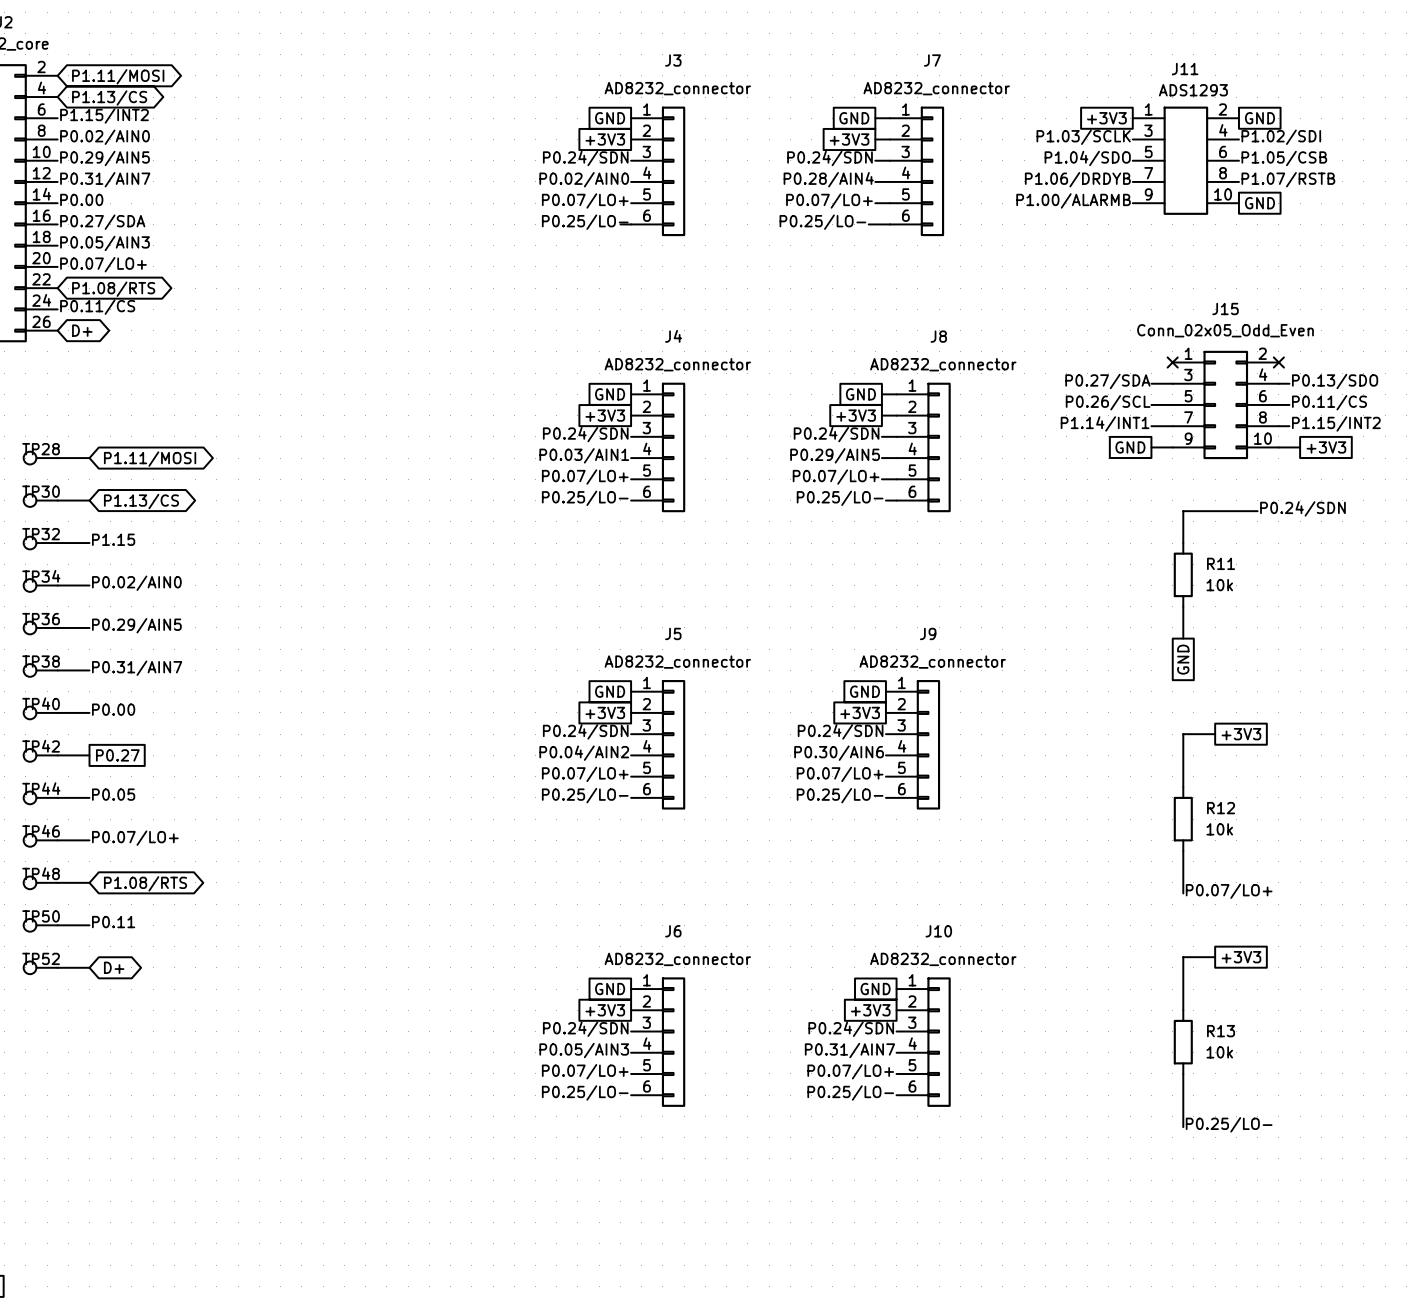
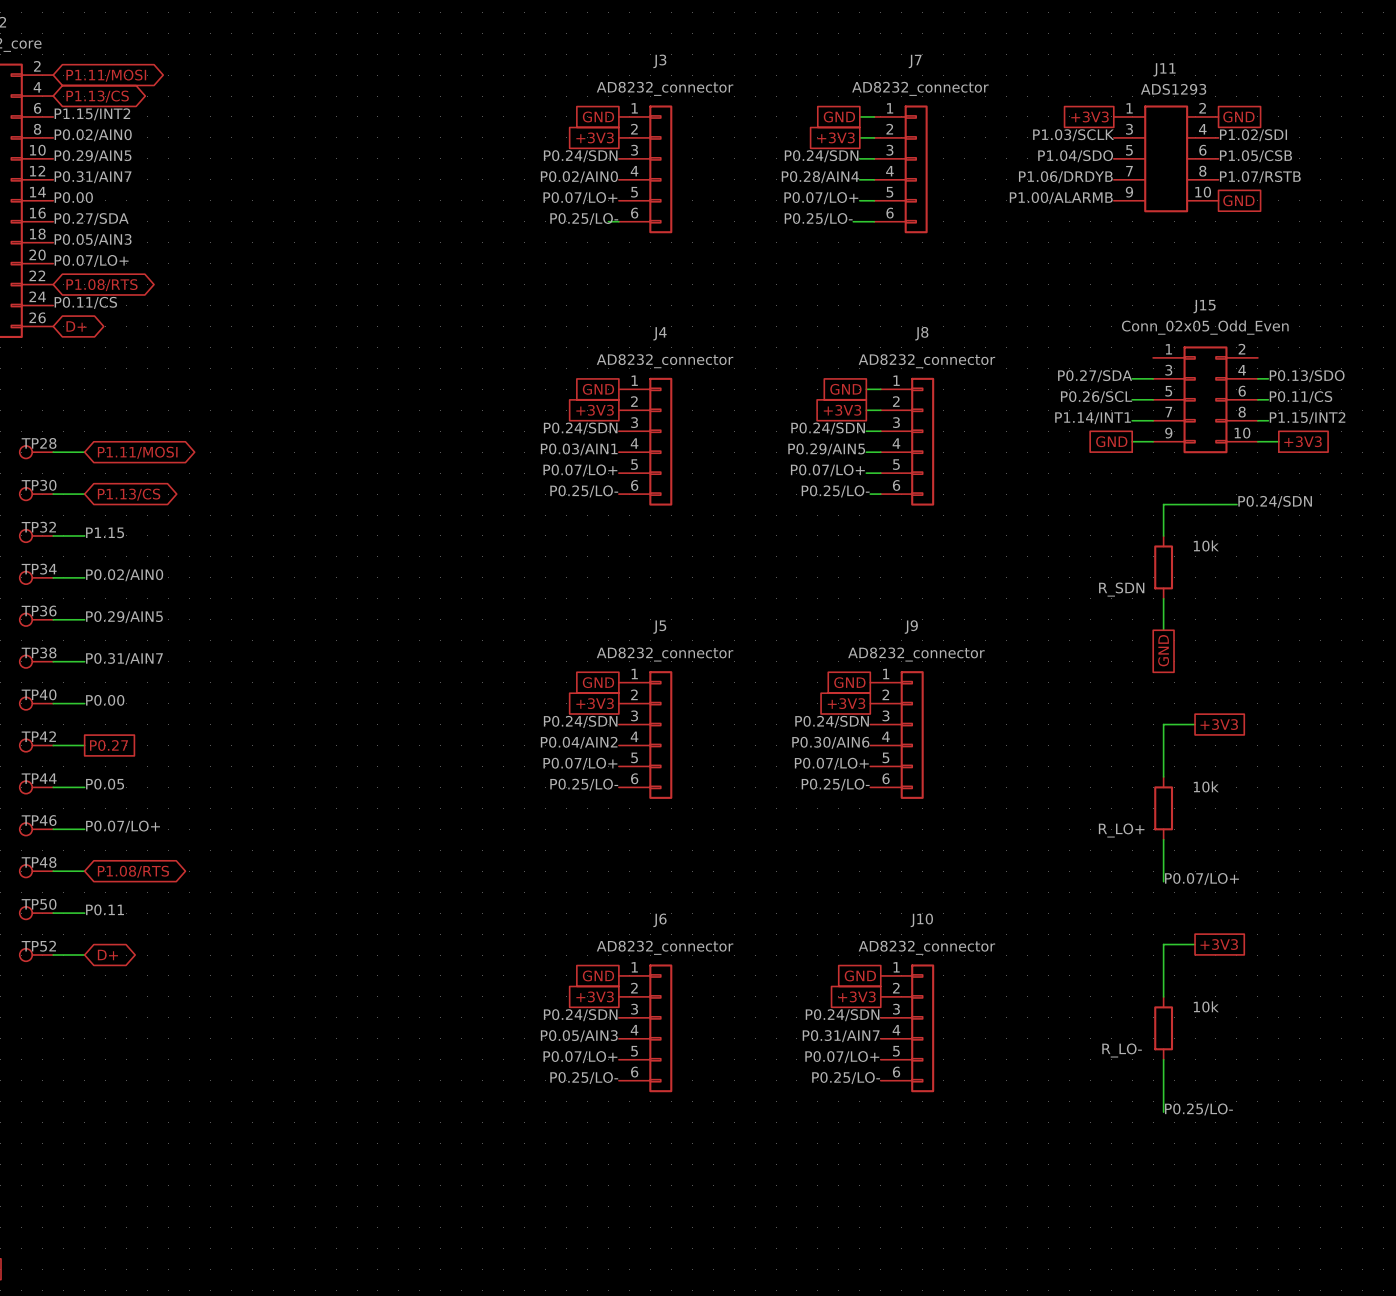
no-connect mark: (1172, 362) -> none
no-connect mark: (1278, 362) -> none
R11 name: R11 (1221, 563) -> R_SDN (1121, 589)
R11 value position: 10k (1219, 585) -> 10k (1206, 545)
R12 name: R12 (1221, 808) -> R_LO+ (1121, 830)
R12 value position: 10k (1219, 829) -> 10k (1206, 786)
R13 name: R13 (1221, 1031) -> R_LO- (1122, 1050)
R13 value position: 10k (1219, 1052) -> 10k (1206, 1006)

